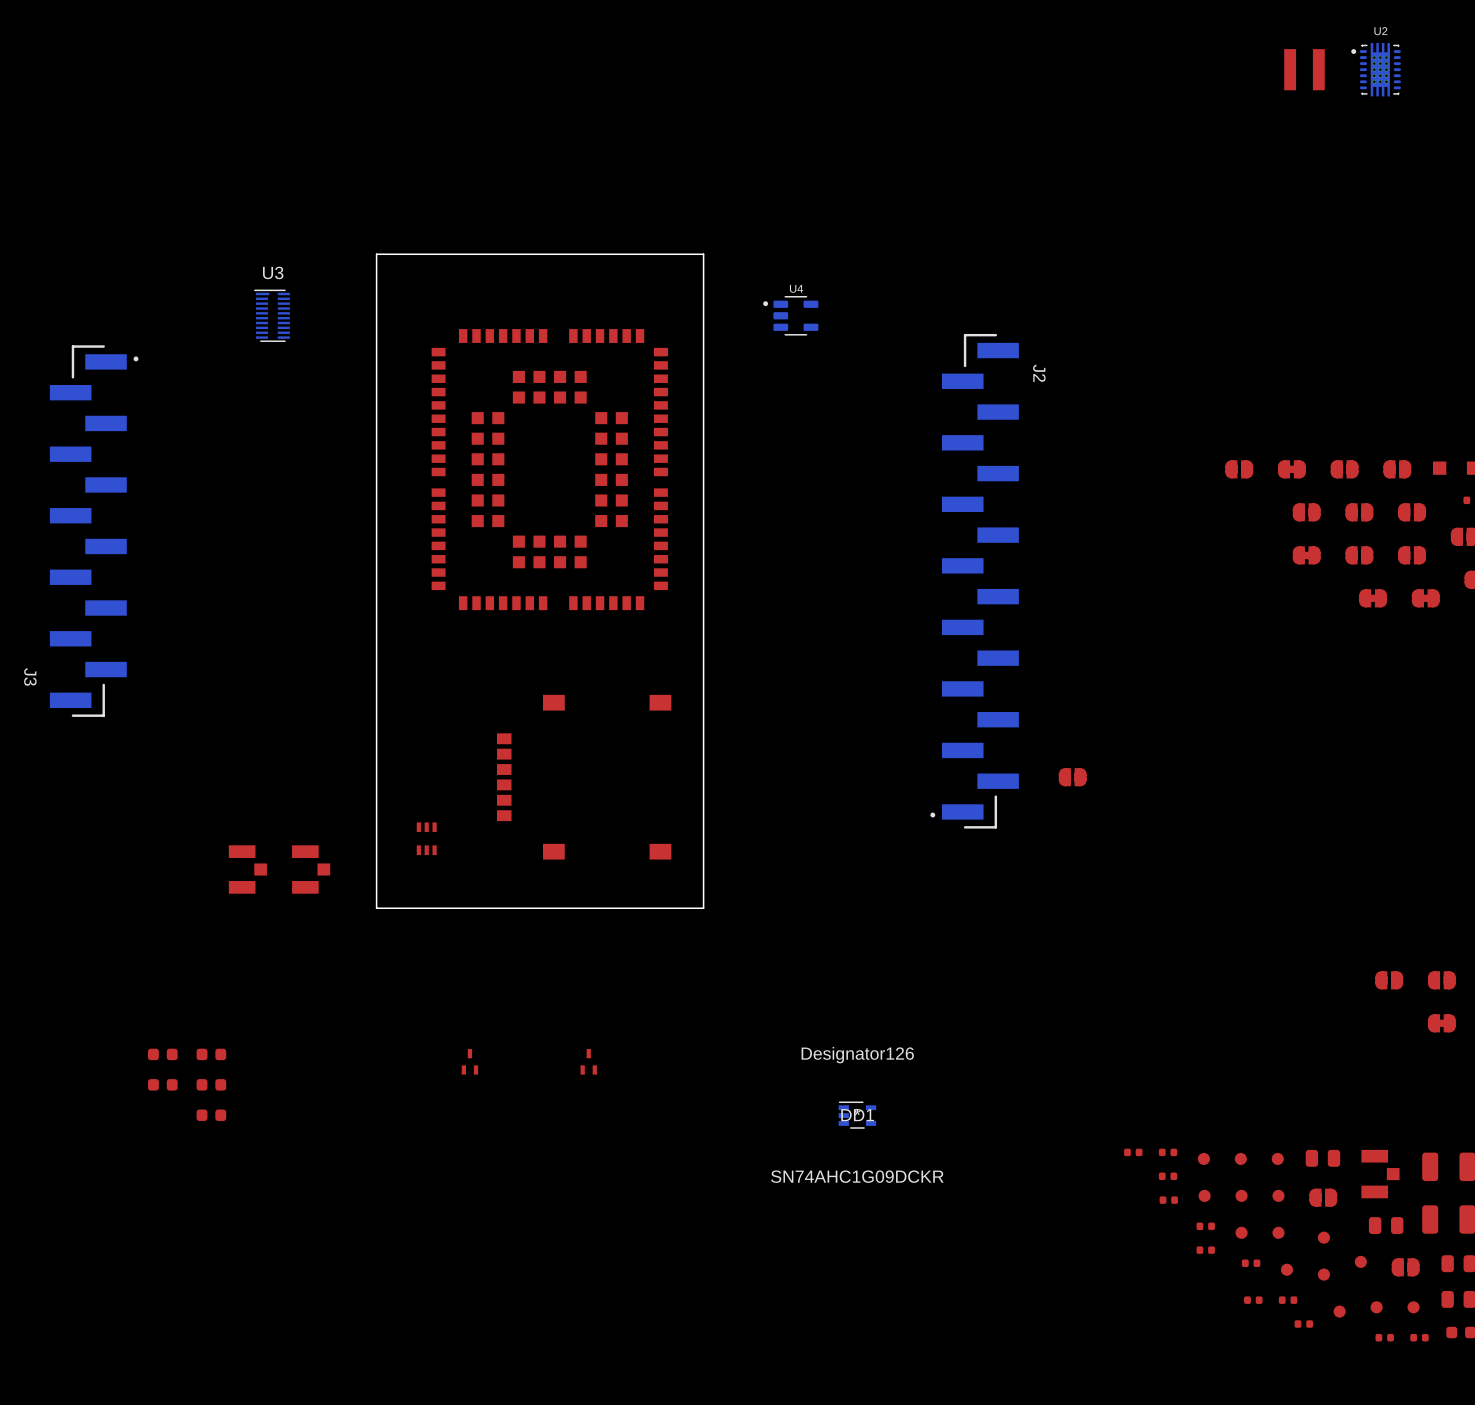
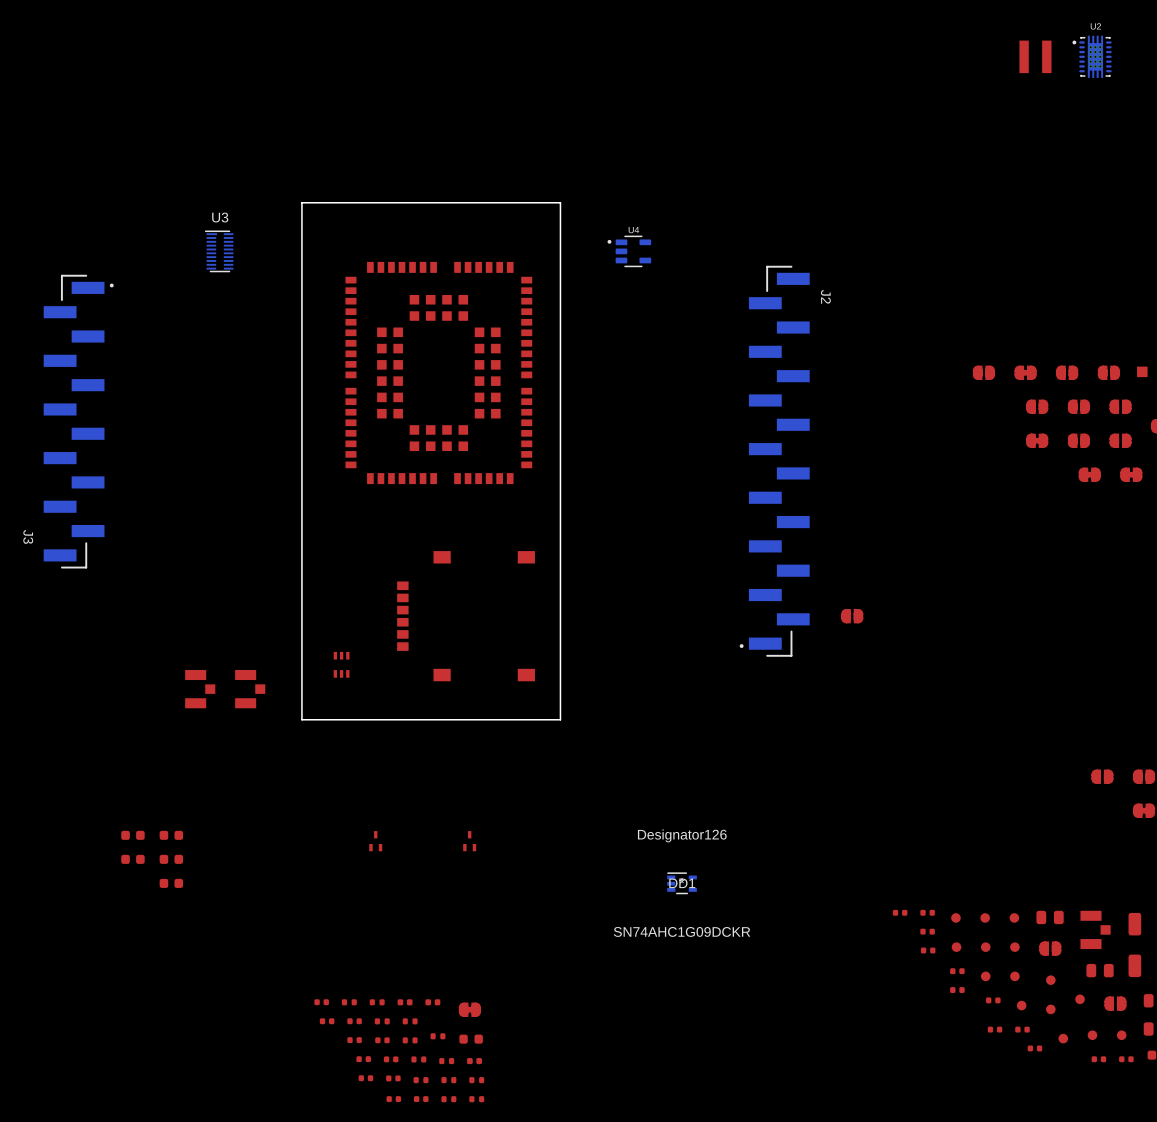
part: none -> (321, 1002)
part: none -> (349, 1002)
part: none -> (377, 1002)
part: none -> (405, 1002)
part: none -> (432, 1002)
part: none -> (469, 1009)
part: none -> (327, 1021)
part: none -> (354, 1021)
part: none -> (382, 1021)
part: none -> (410, 1021)
part: none -> (437, 1036)
part: none -> (471, 1039)
part: none -> (354, 1040)
part: none -> (382, 1040)
part: none -> (410, 1040)
part: none -> (363, 1059)
part: none -> (391, 1059)
part: none -> (418, 1059)
part: none -> (446, 1061)
part: none -> (474, 1061)
part: none -> (365, 1078)
part: none -> (393, 1078)
part: none -> (421, 1080)
part: none -> (448, 1080)
part: none -> (476, 1080)
part: none -> (393, 1099)
part: none -> (421, 1099)
part: none -> (448, 1099)
part: none -> (476, 1099)

